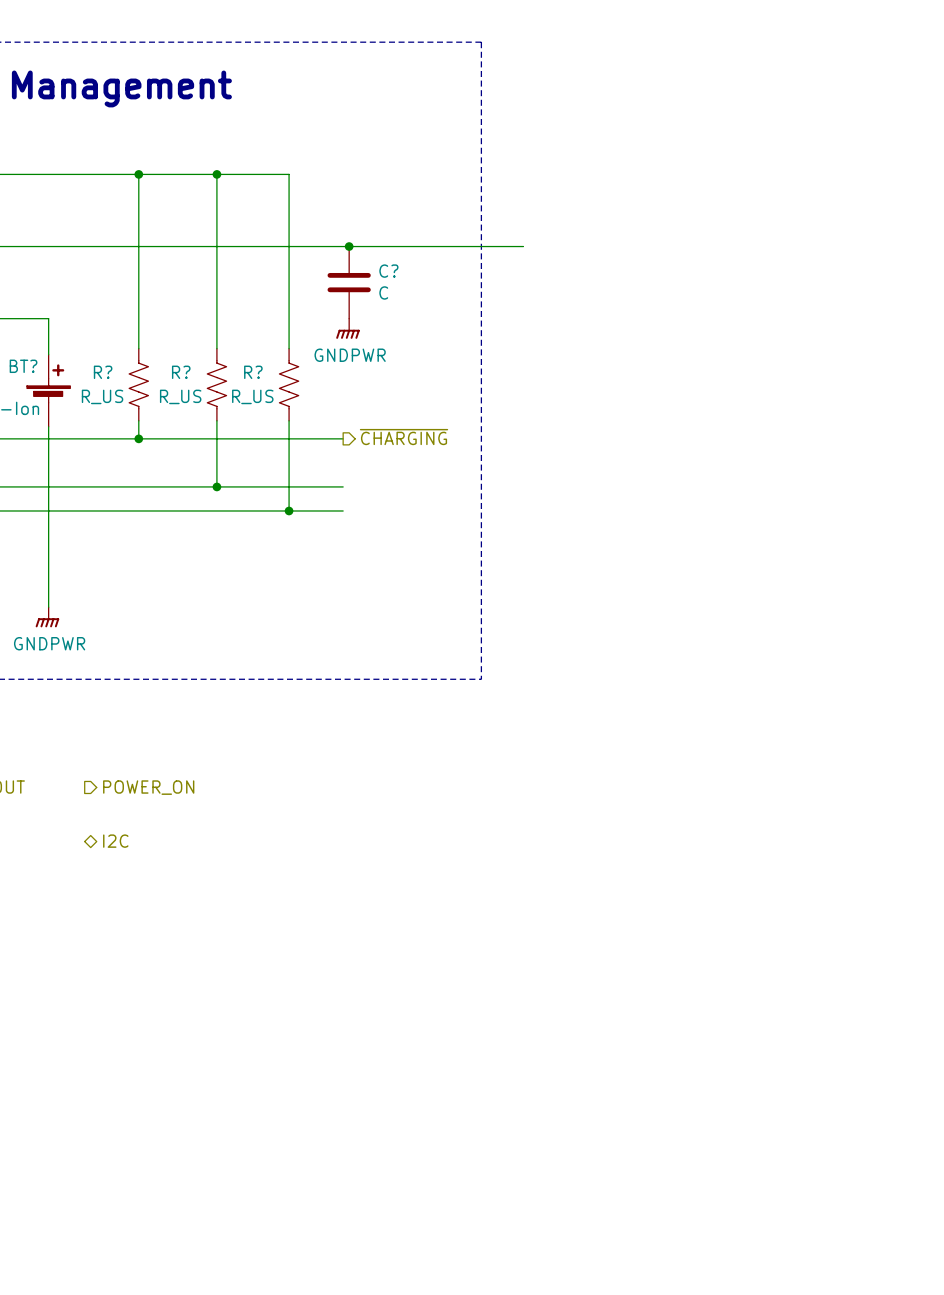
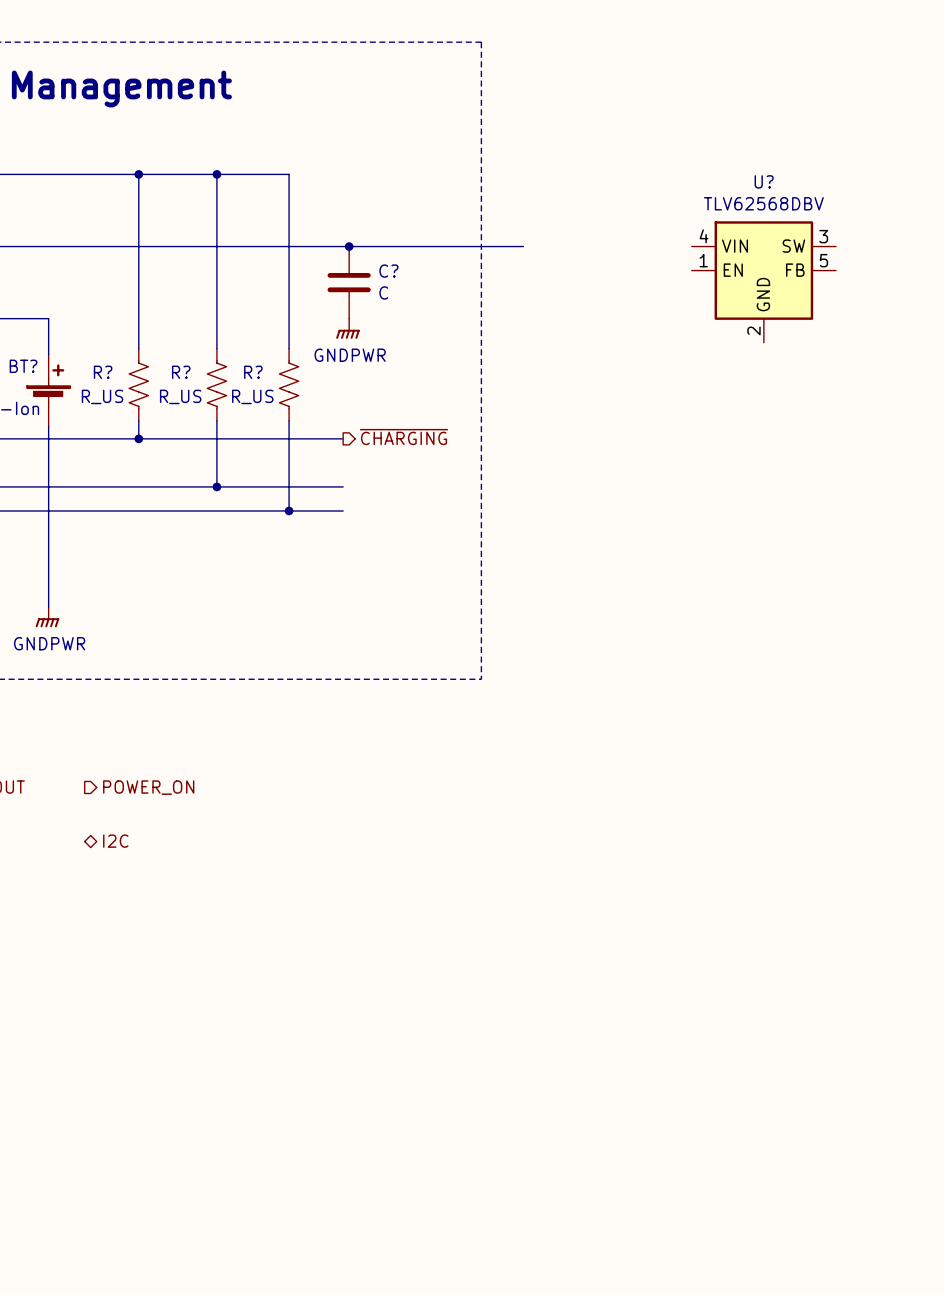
U?: none -> TLV62568DBV (763, 282)

